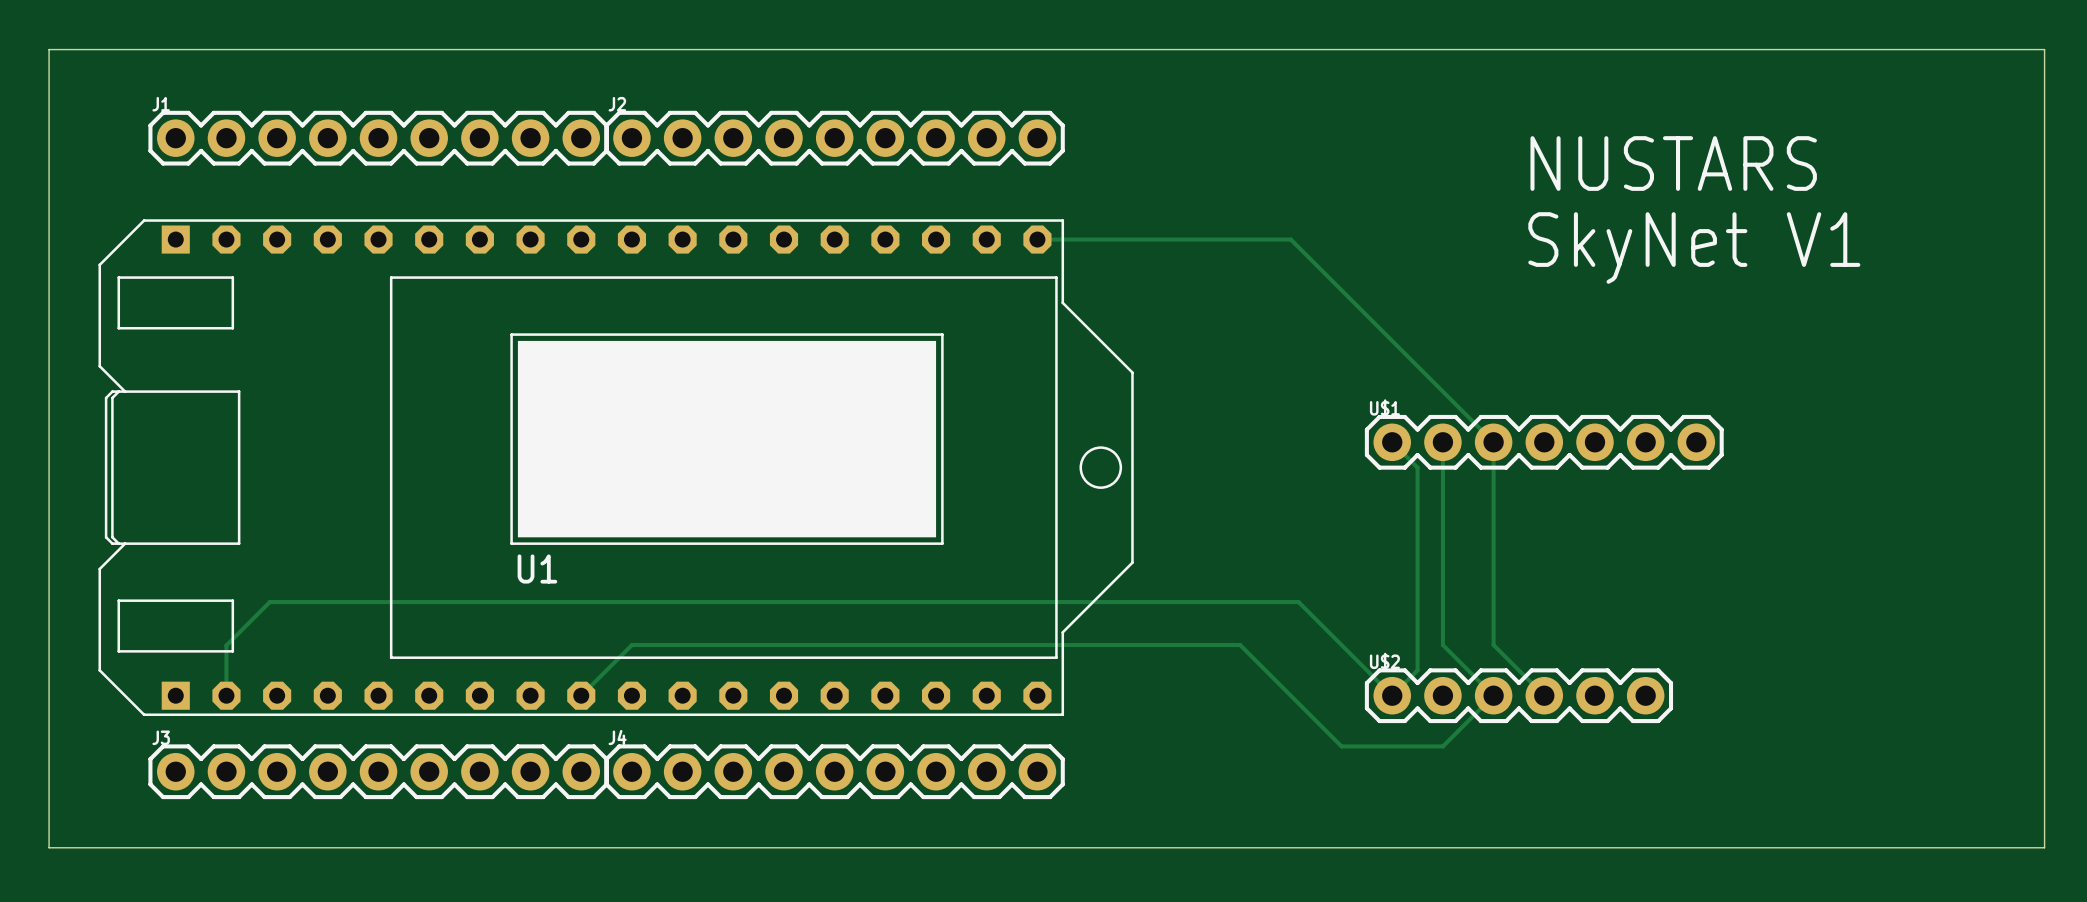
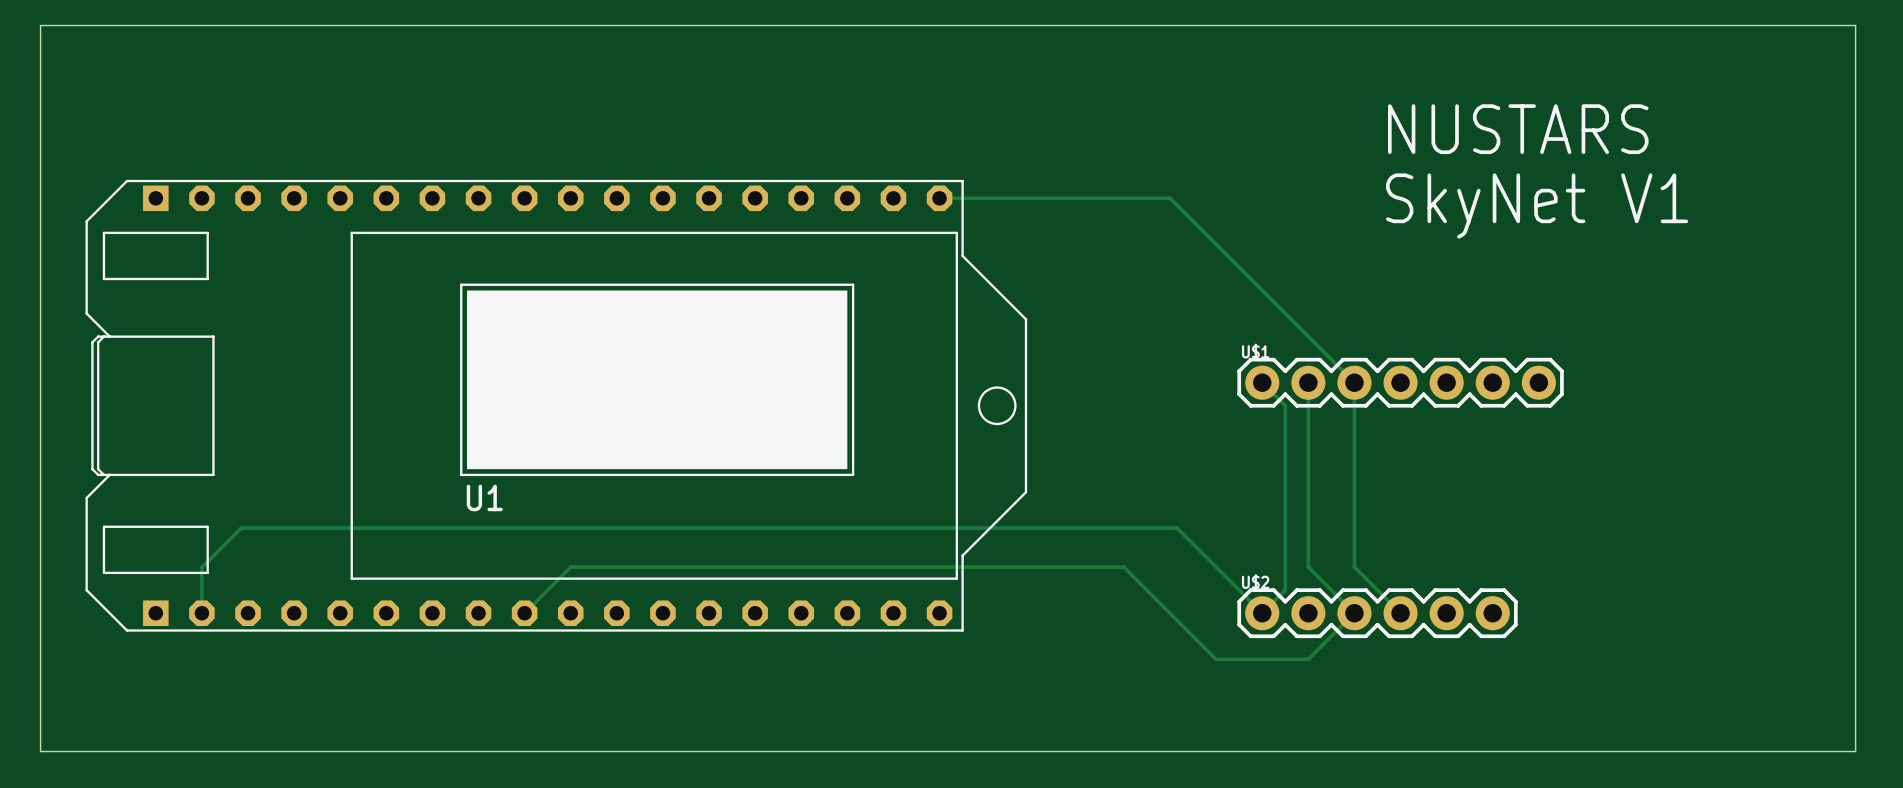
J1: (378, 138) -> none
J2: (834, 138) -> none
J3: (378, 771) -> none
J4: (834, 771) -> none

